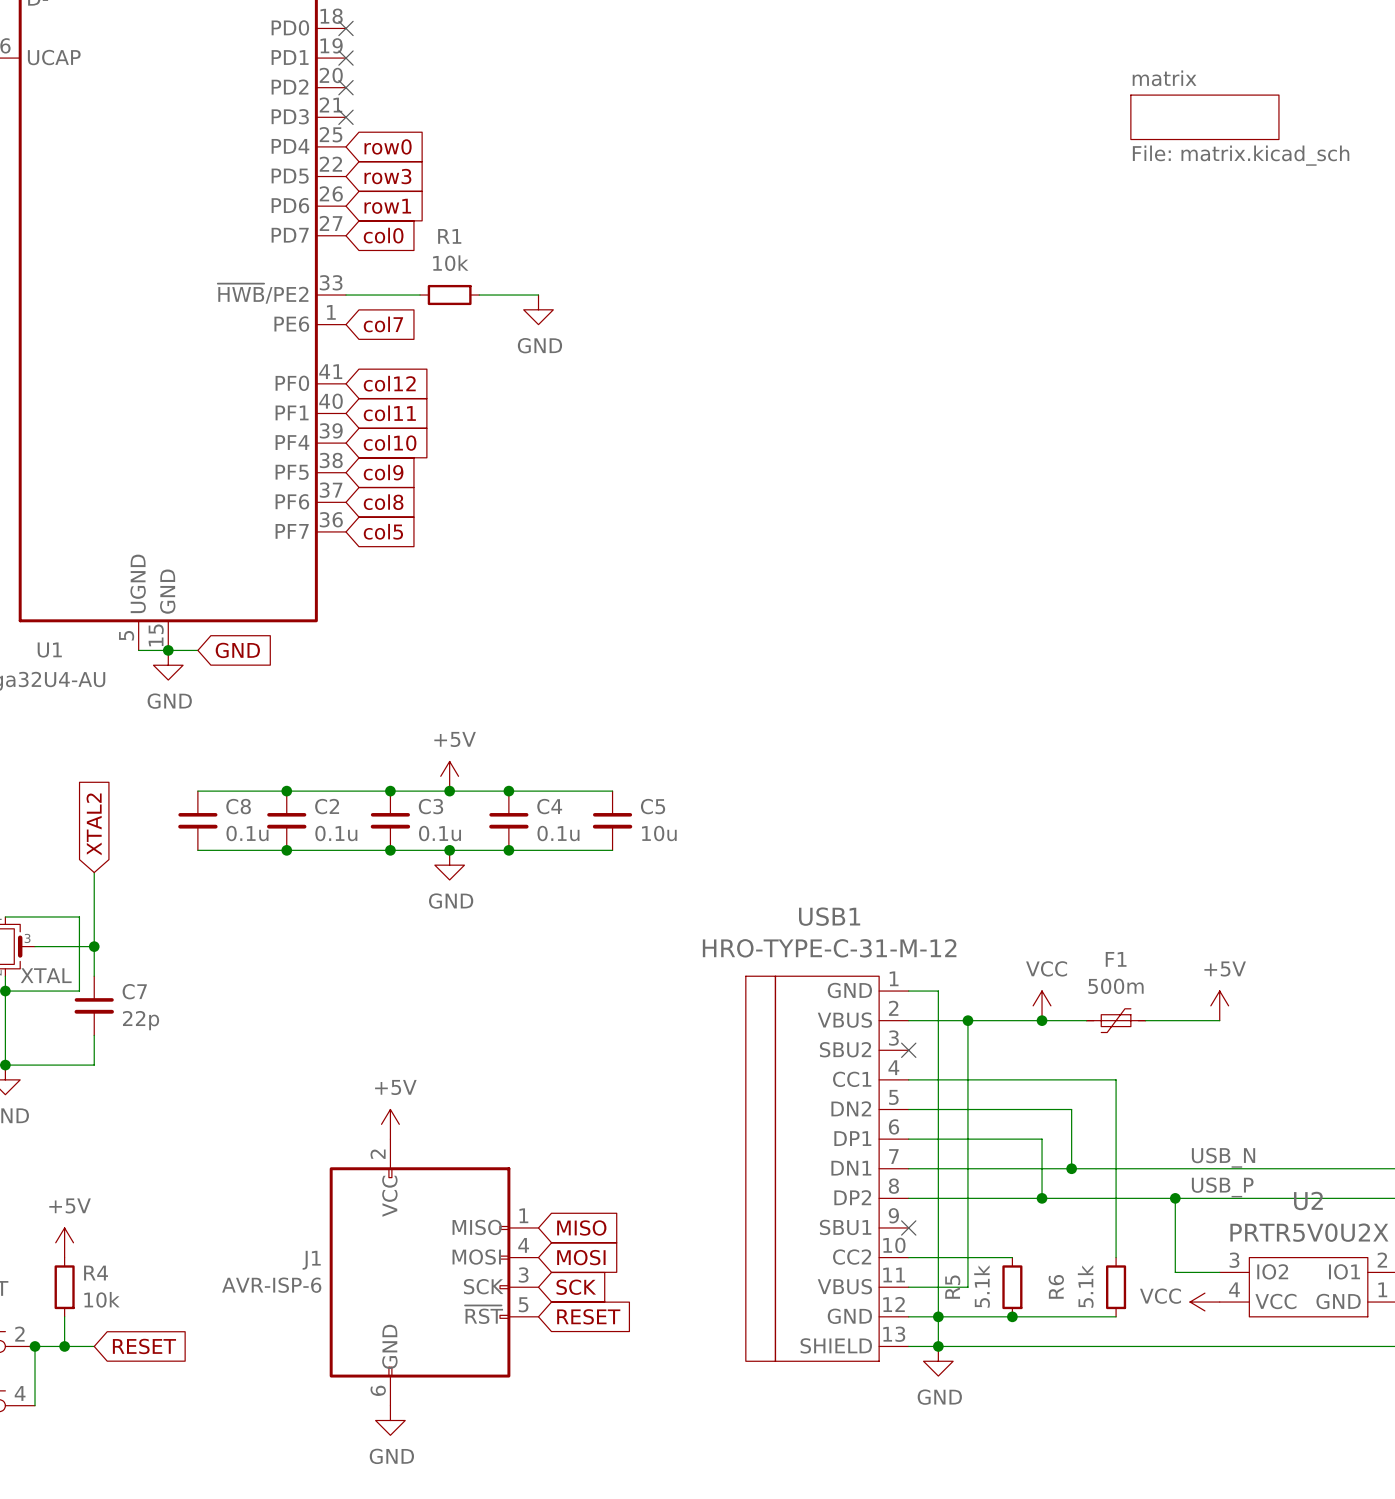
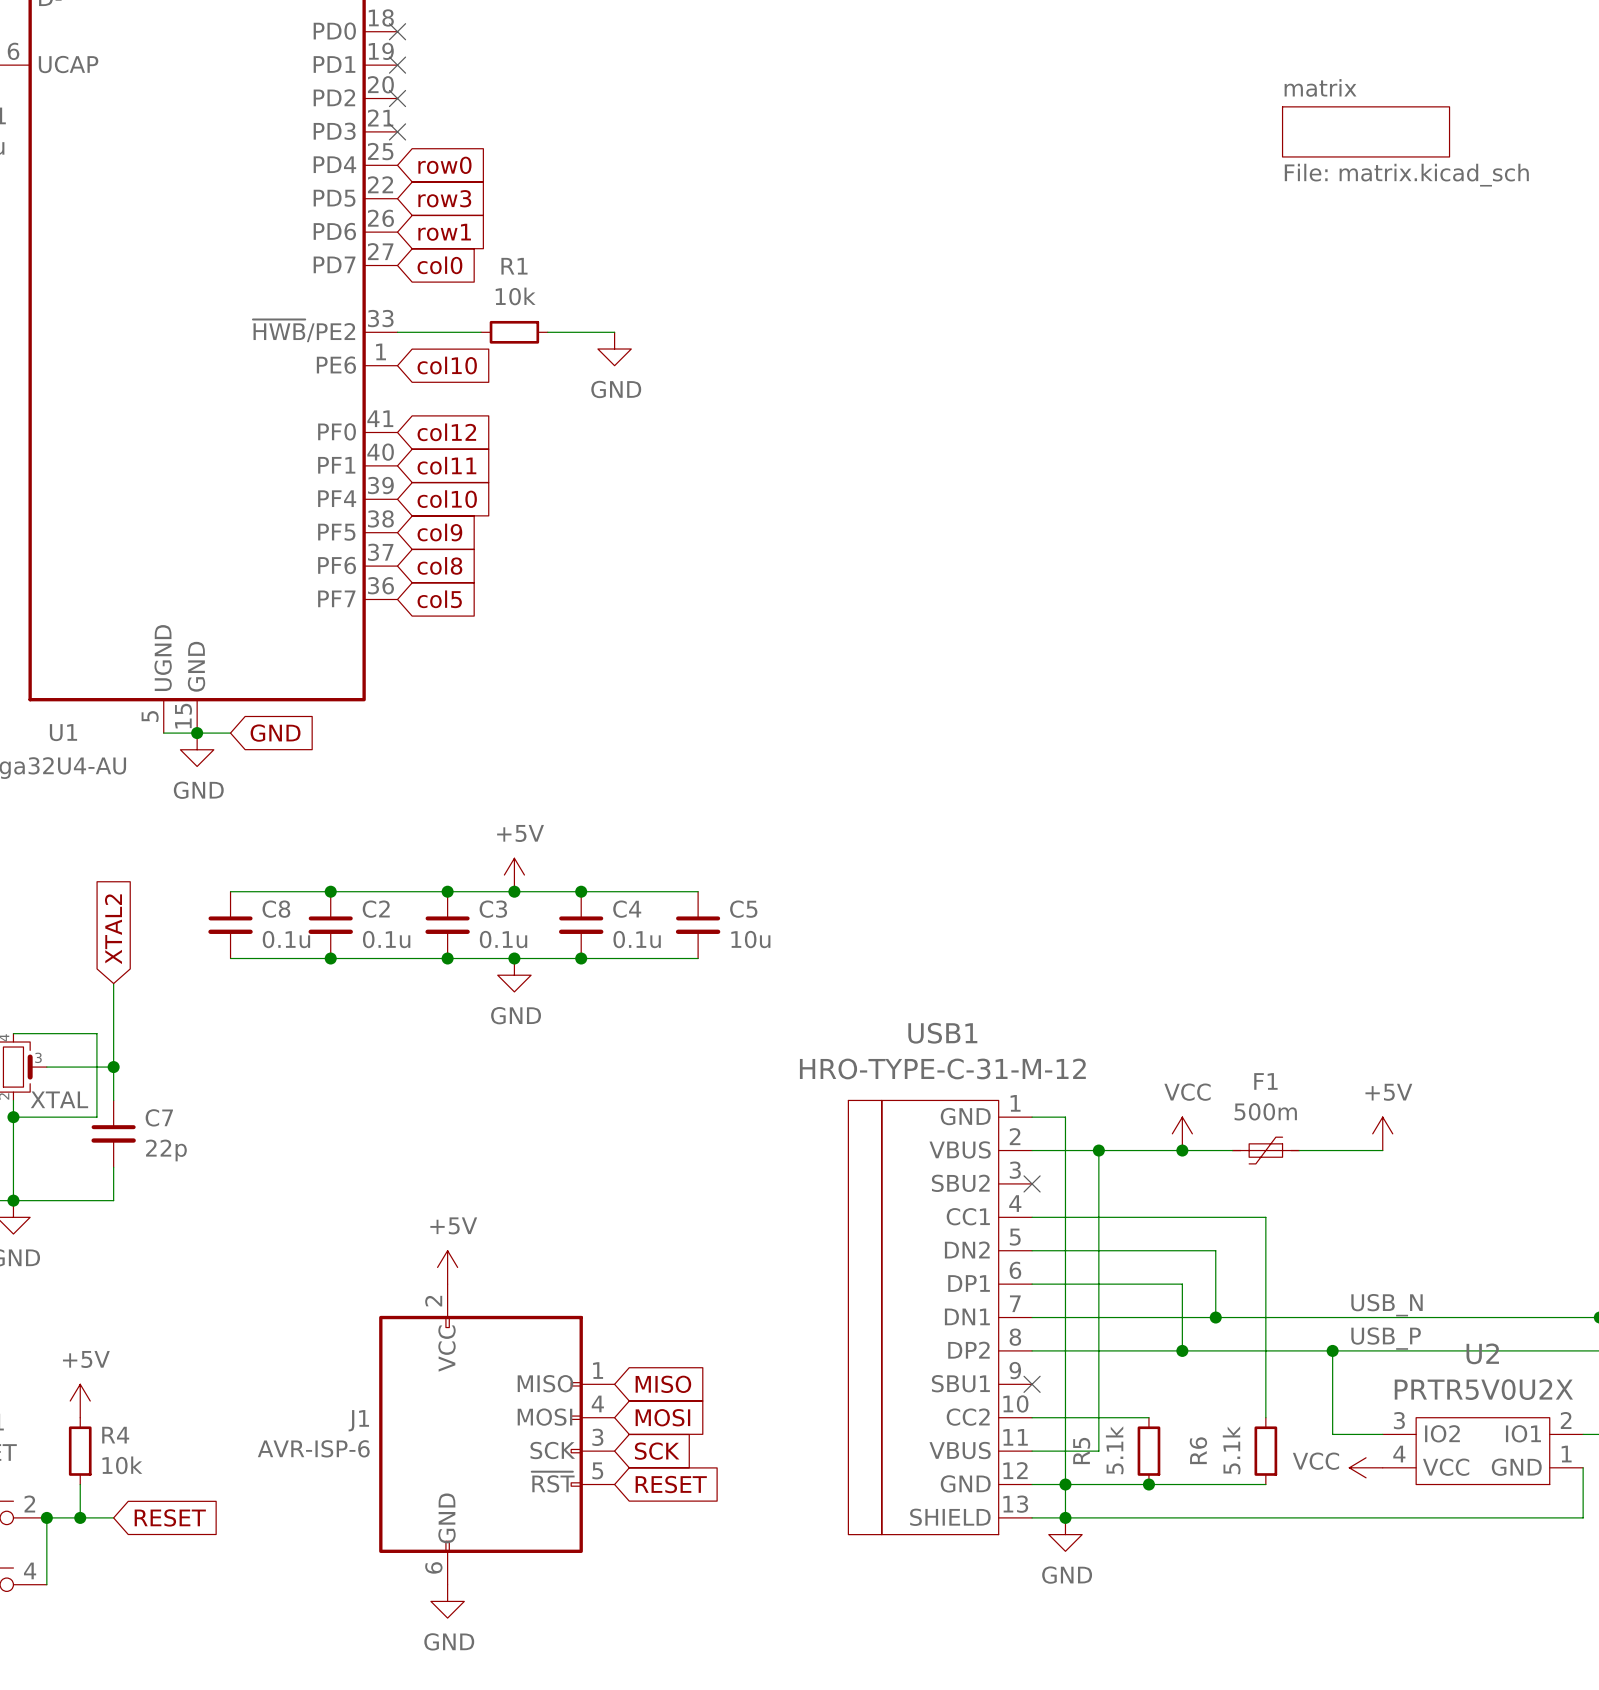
global label: col7 (383, 324) -> col10 (447, 365)

